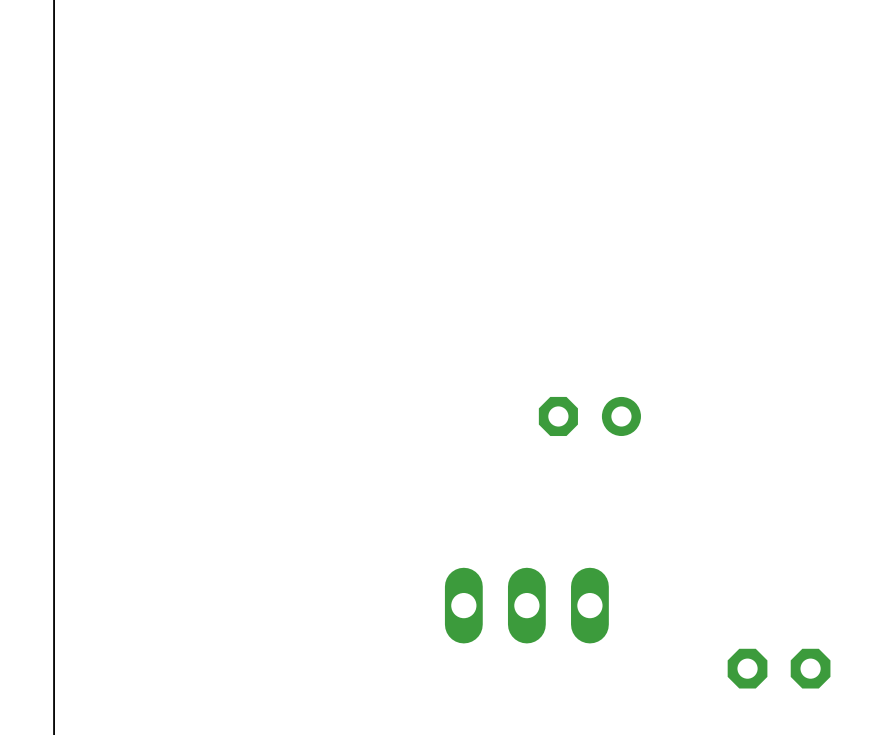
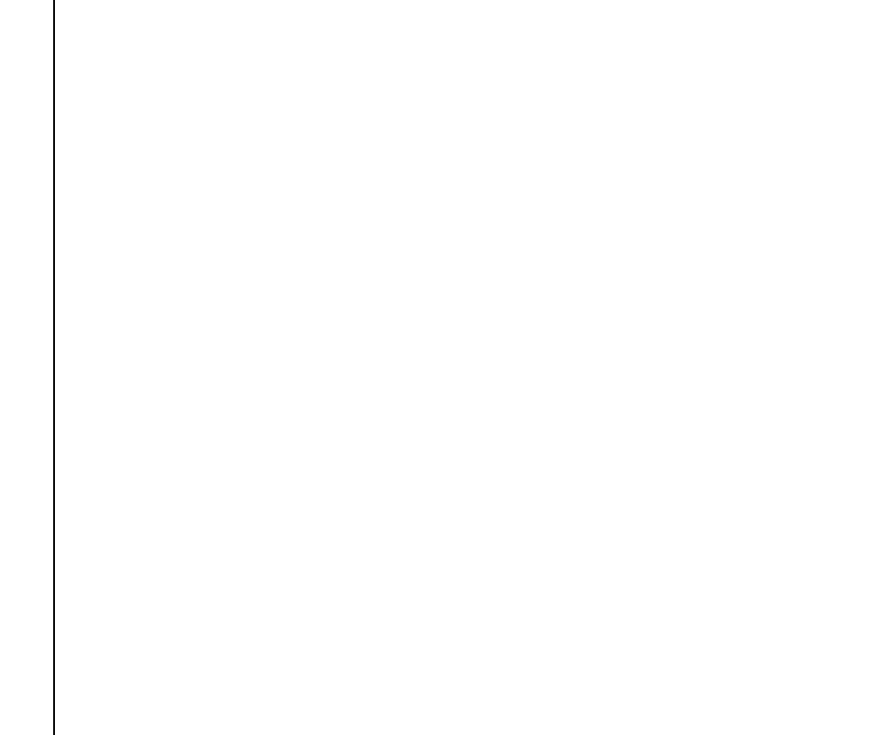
part: (589, 416) -> none
part: (526, 605) -> none
part: (779, 668) -> none

